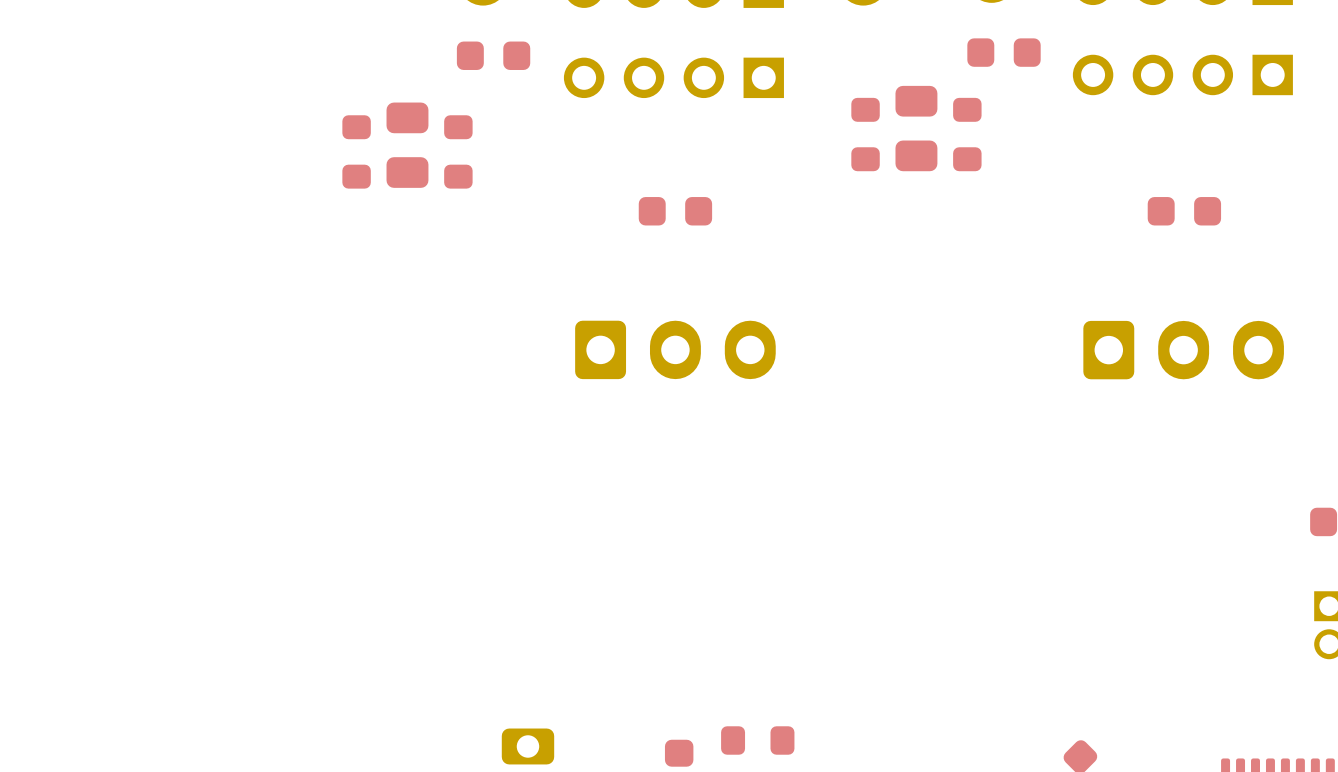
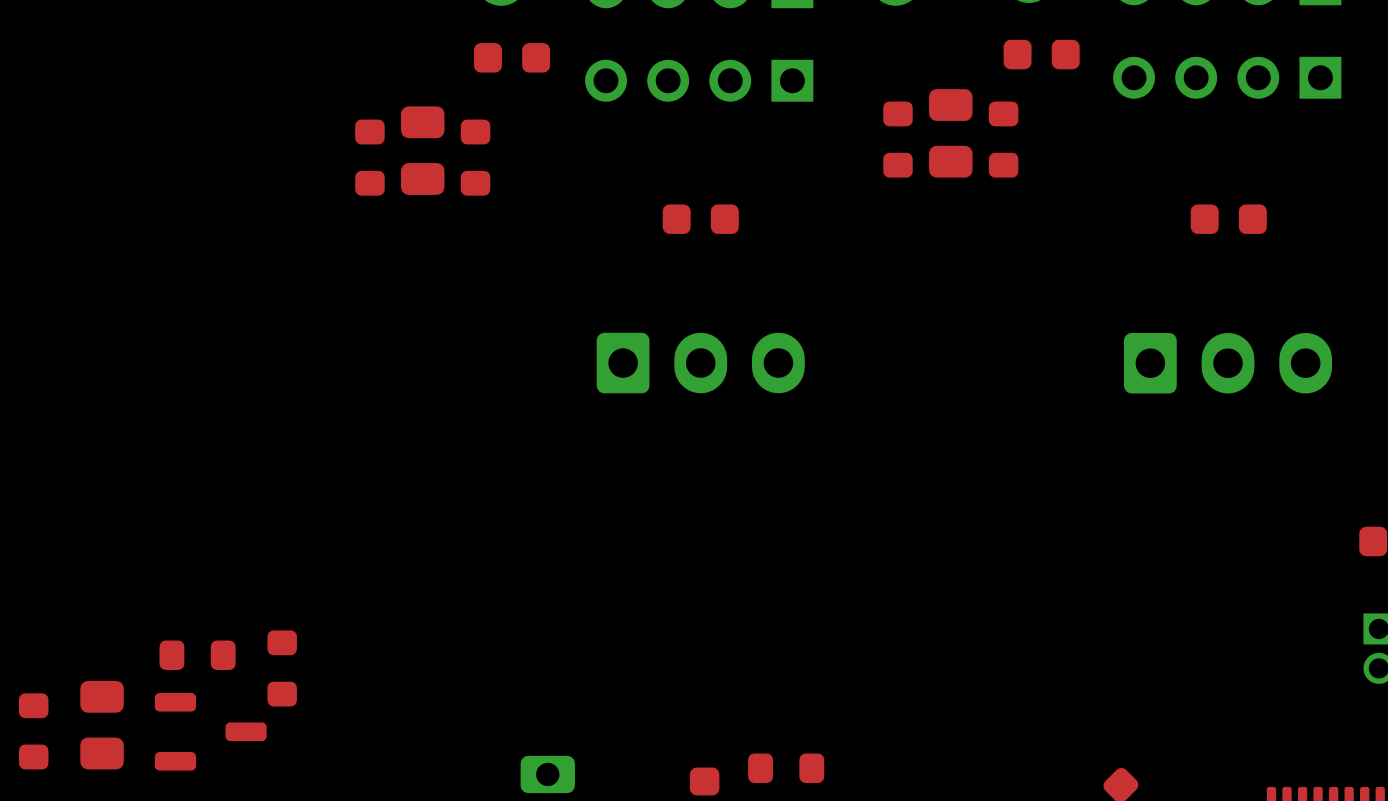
part: none -> (197, 655)
part: none -> (282, 668)
part: none -> (102, 725)
part: none -> (33, 731)
part: none -> (210, 731)

